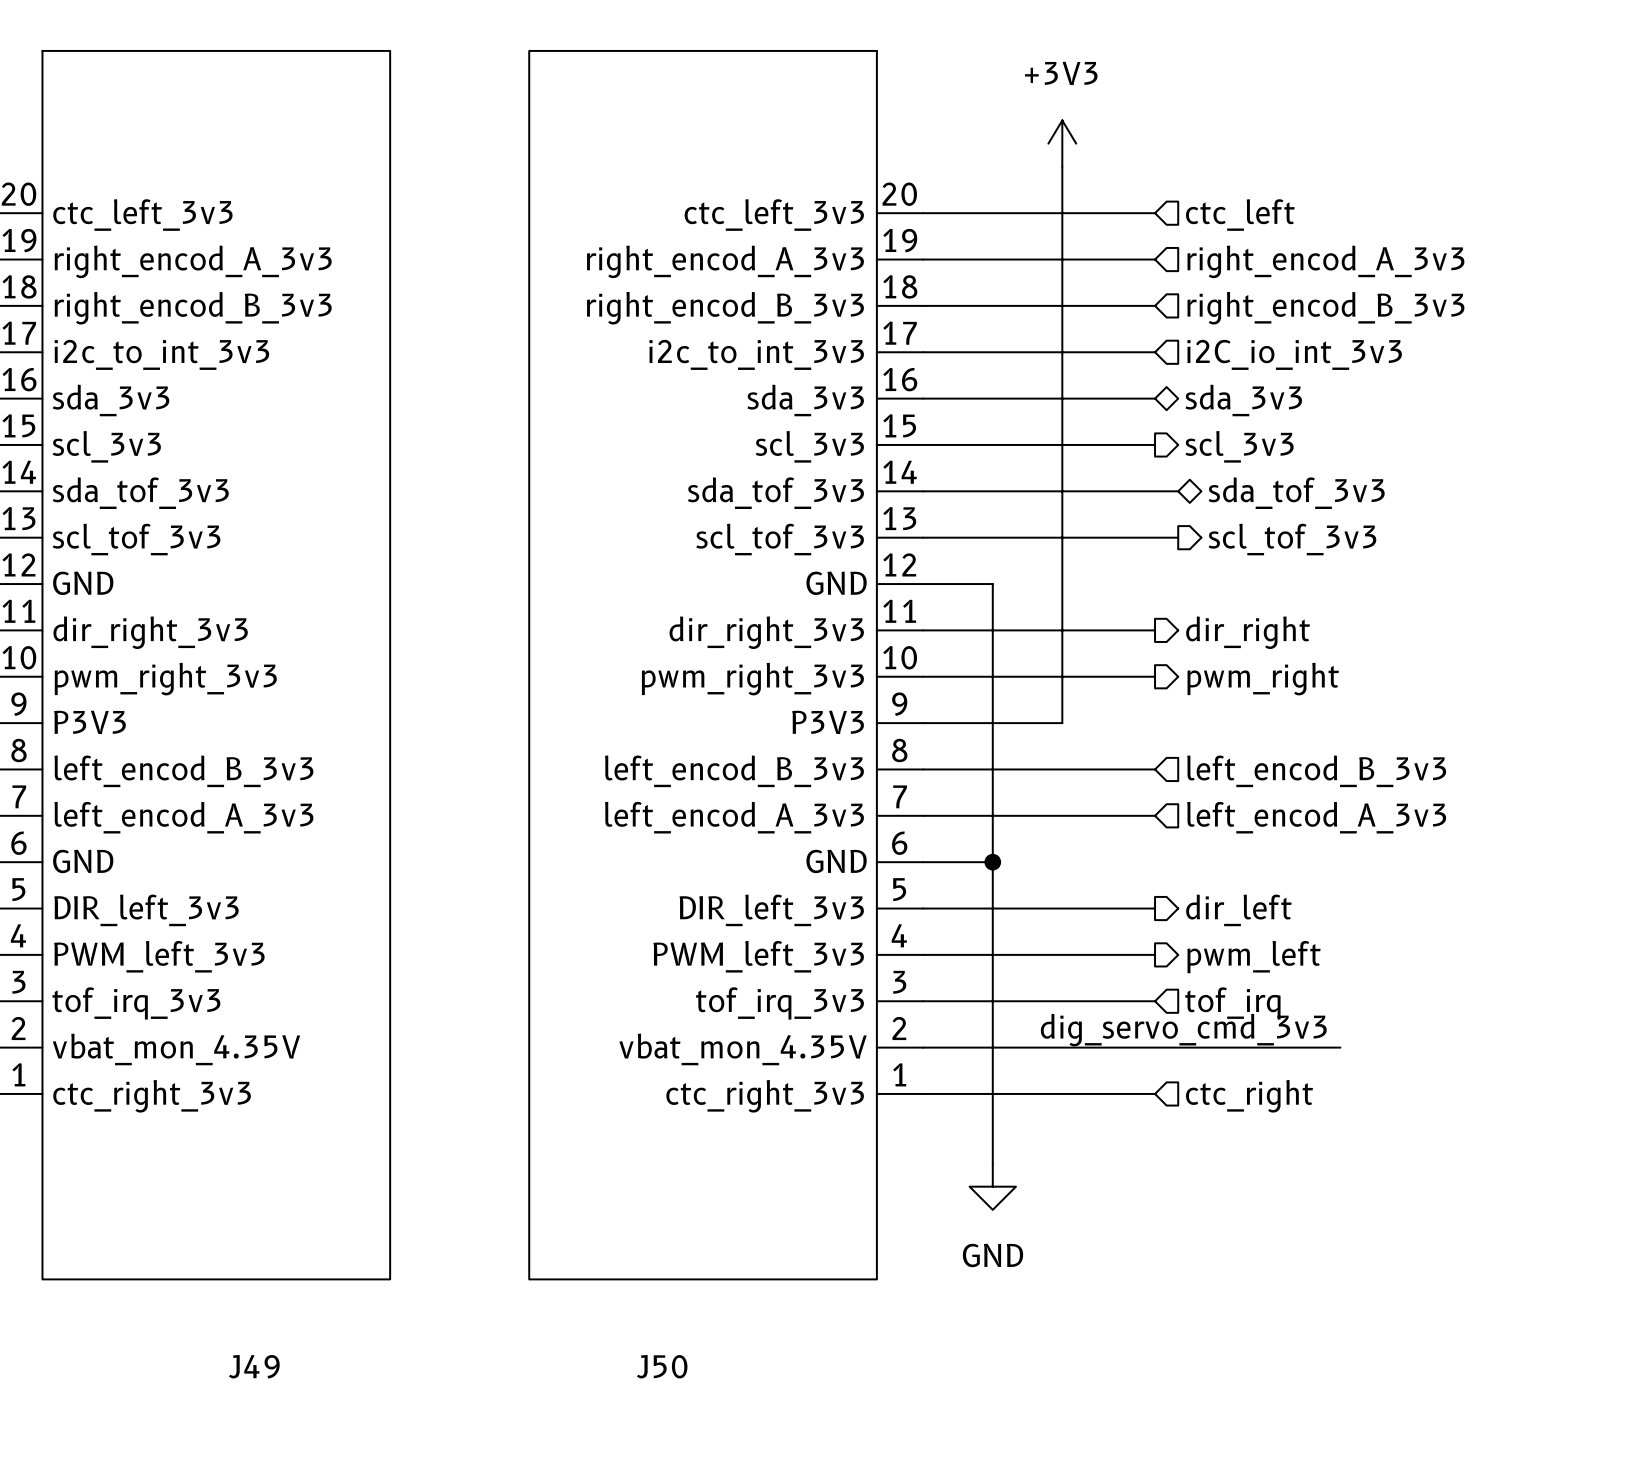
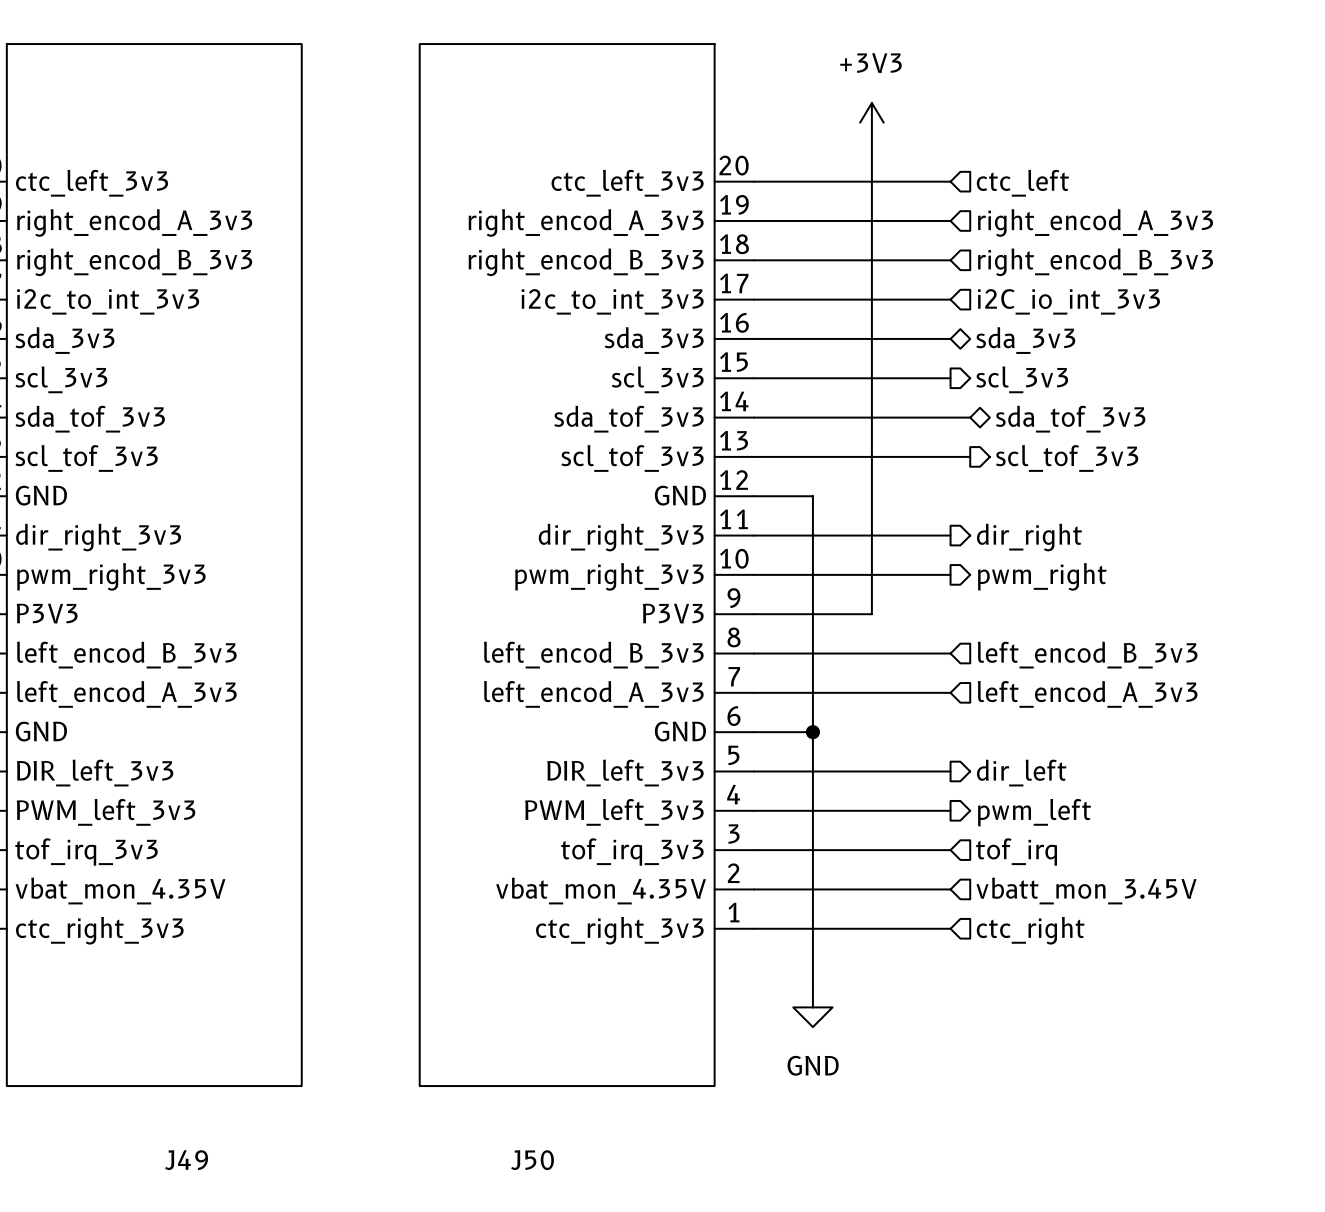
label: dig_servo_cmd_3v3 (1183, 1030) -> none
wire: (1155, 1047) (1340, 1047) -> none
hierarchical label: none -> vbatt_mon_3.45V (1086, 891)

